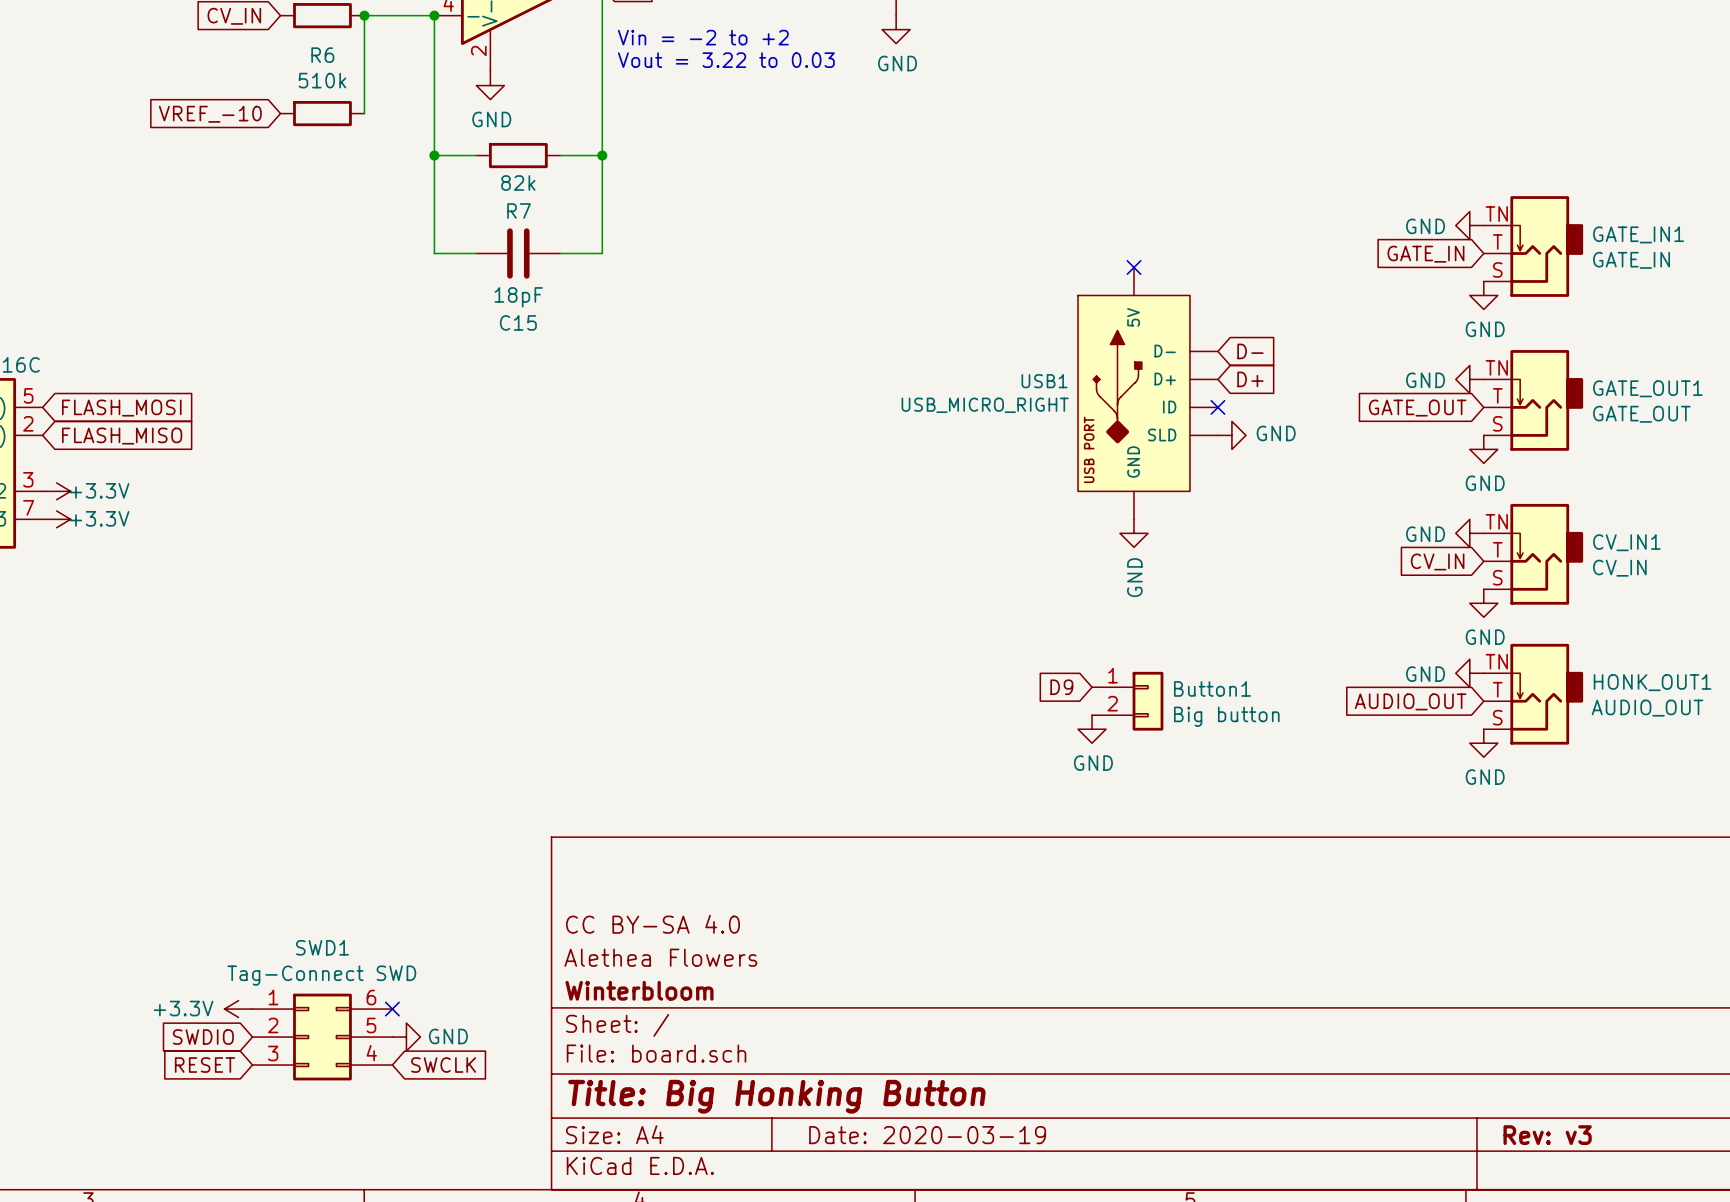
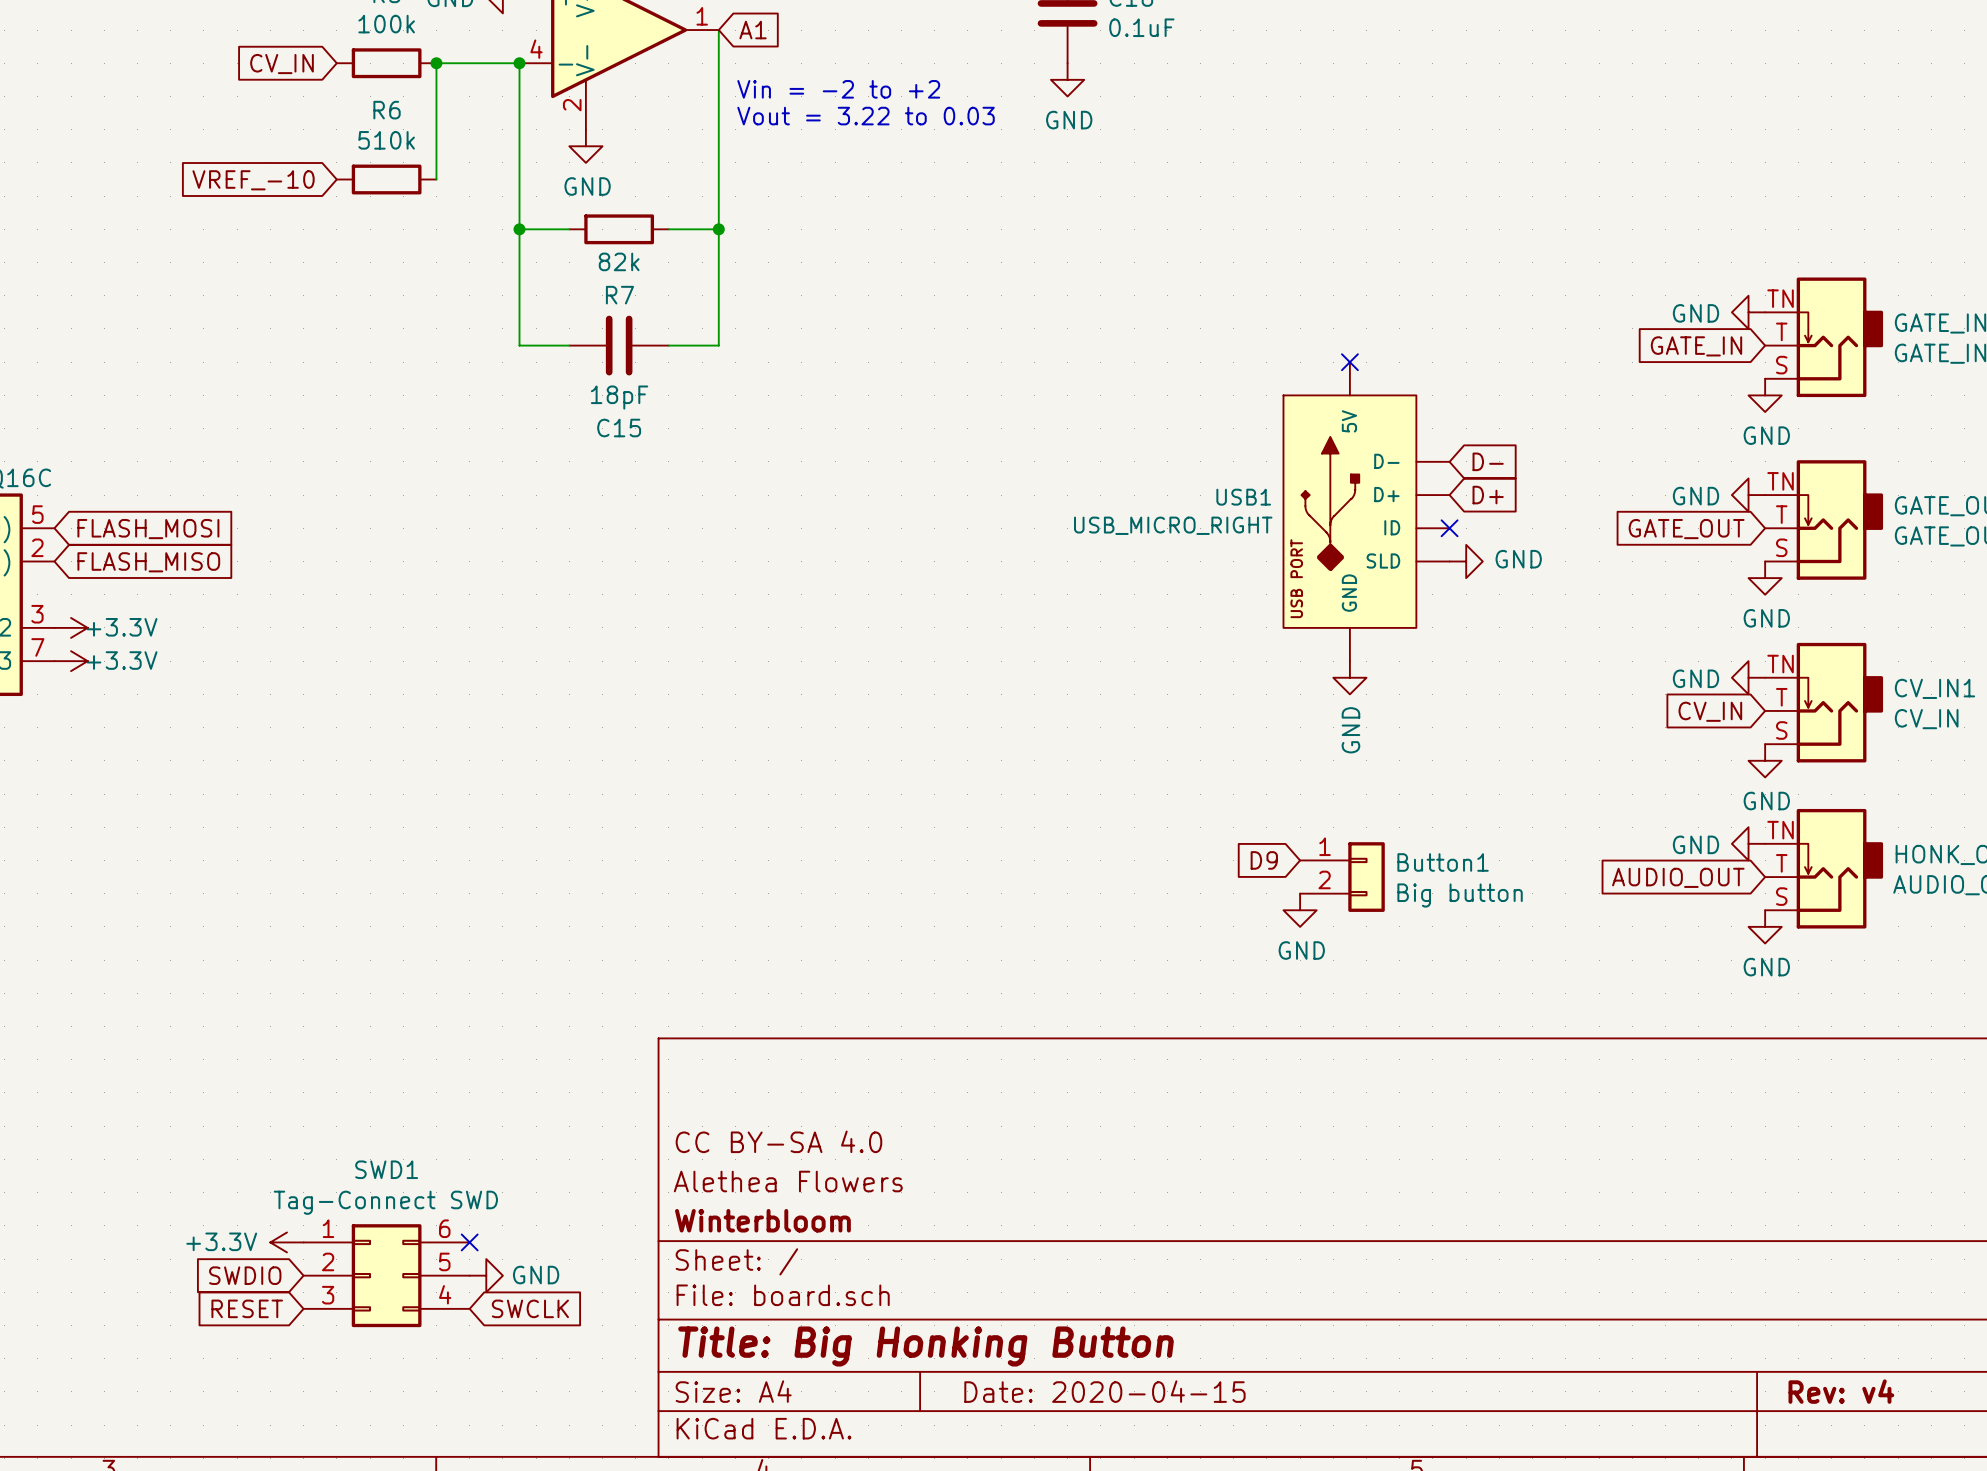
title block: Date: 2020-03-19 (927, 1135) -> Date: 2020-04-15 (1104, 1391)
title block: Rev: v3 (1547, 1135) -> Rev: v4 (1841, 1391)

